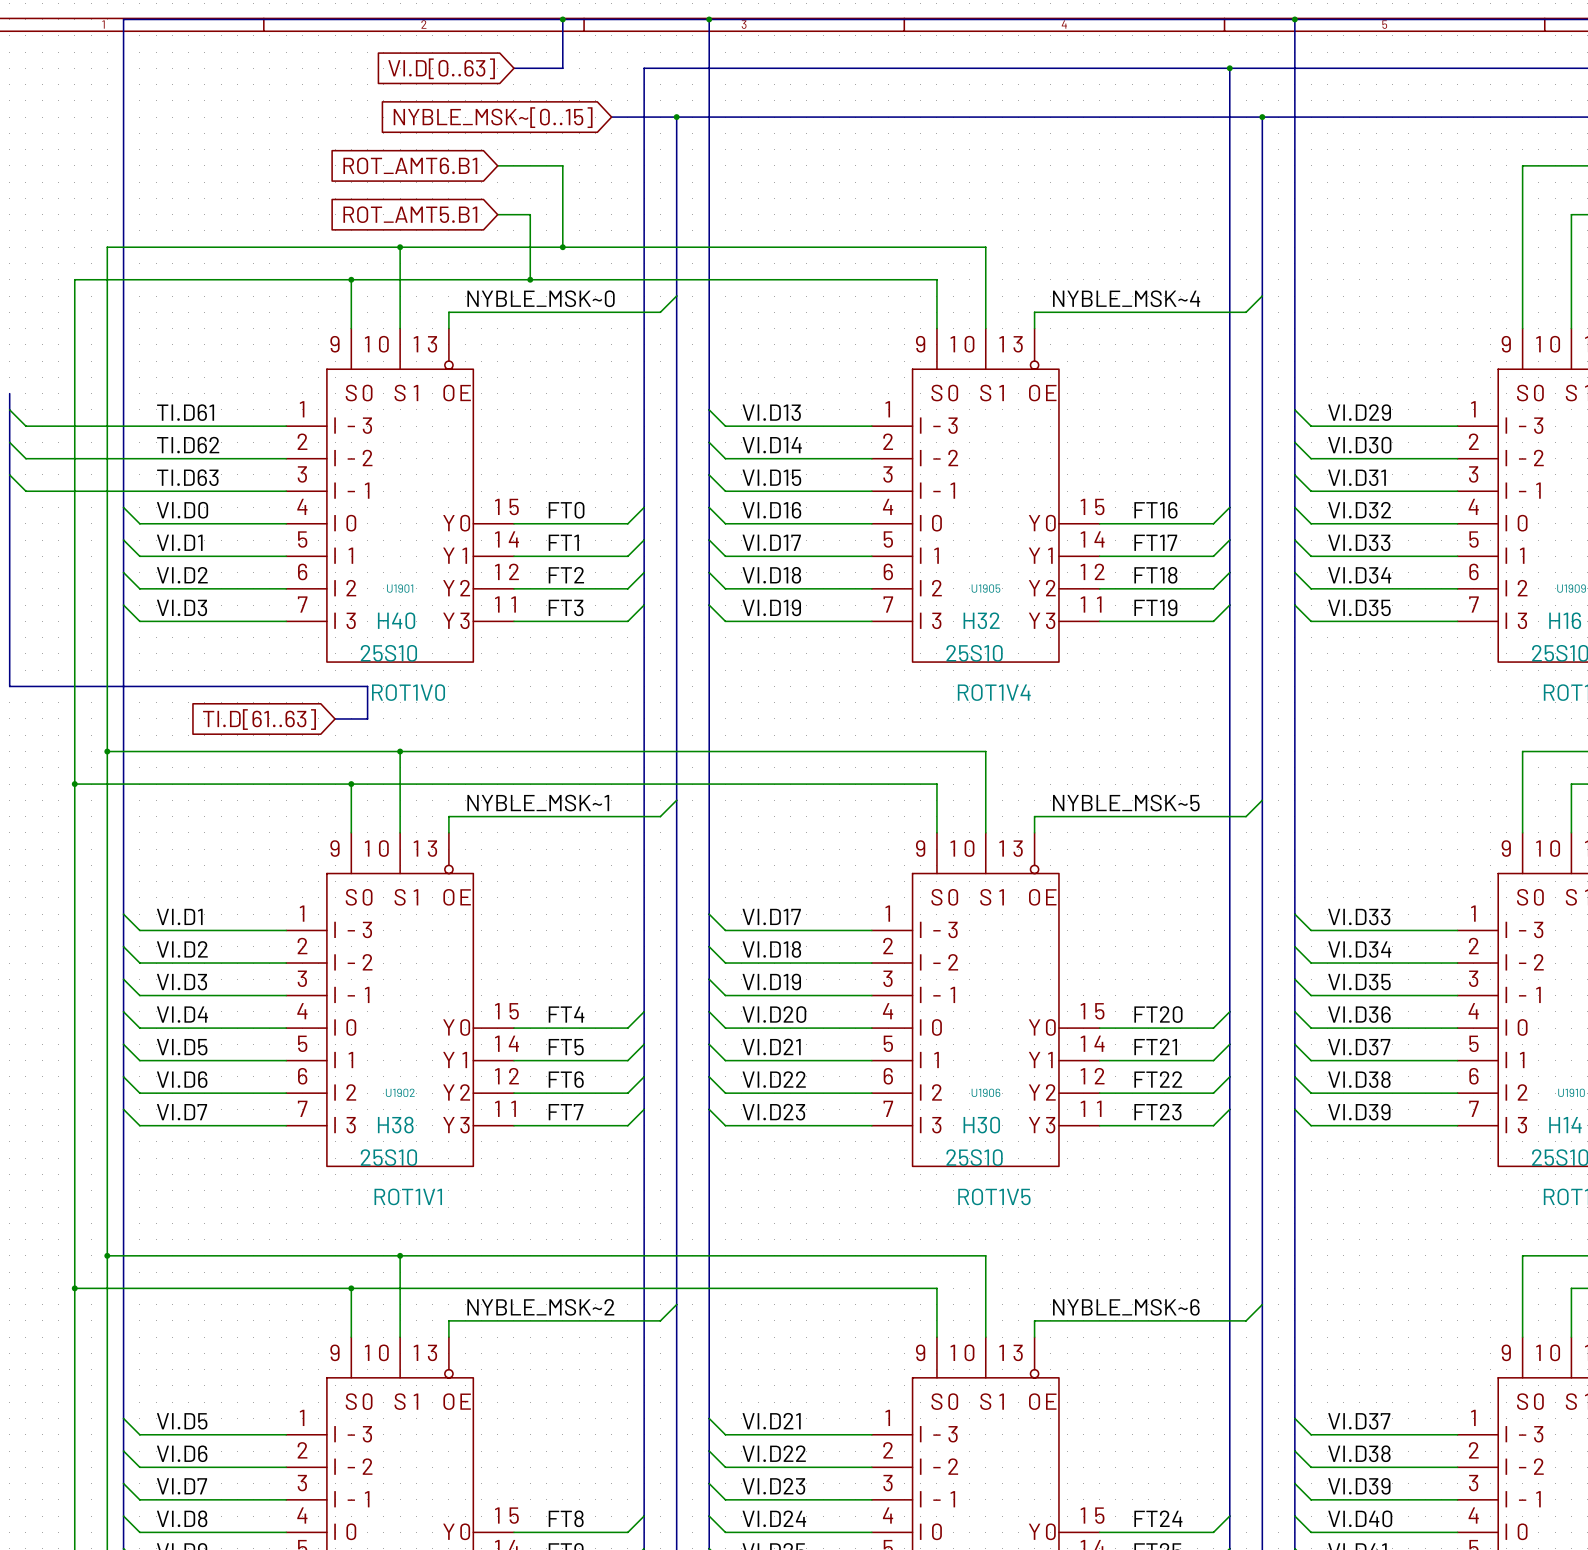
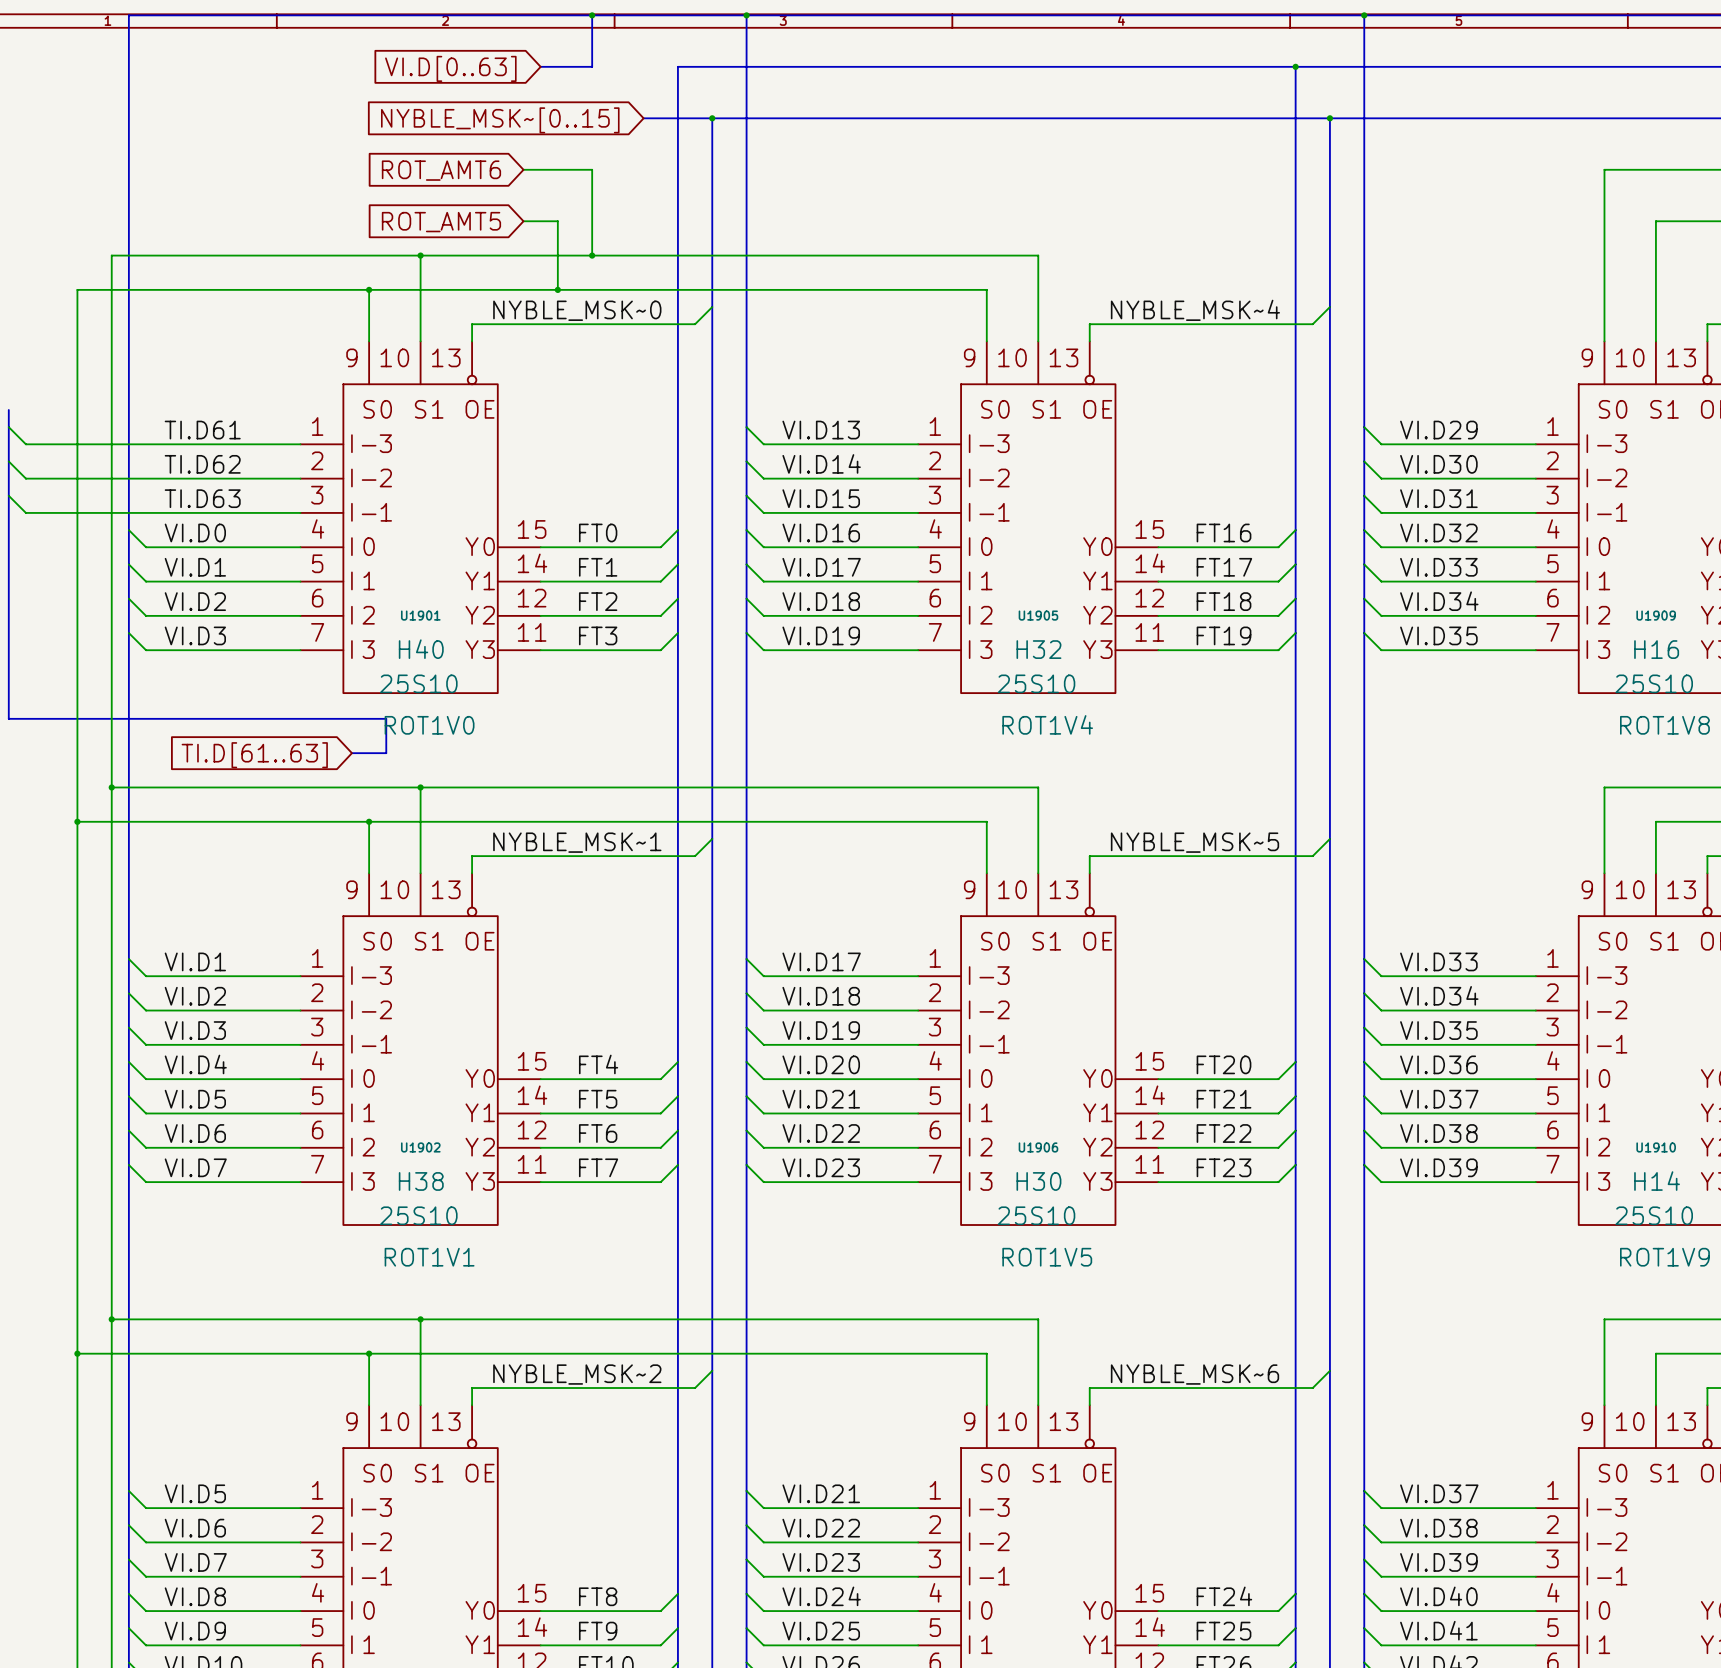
global label: ROT_AMT6.B1 (410, 165) -> ROT_AMT6 (441, 170)
global label: ROT_AMT5.B1 (410, 214) -> ROT_AMT5 (441, 222)

